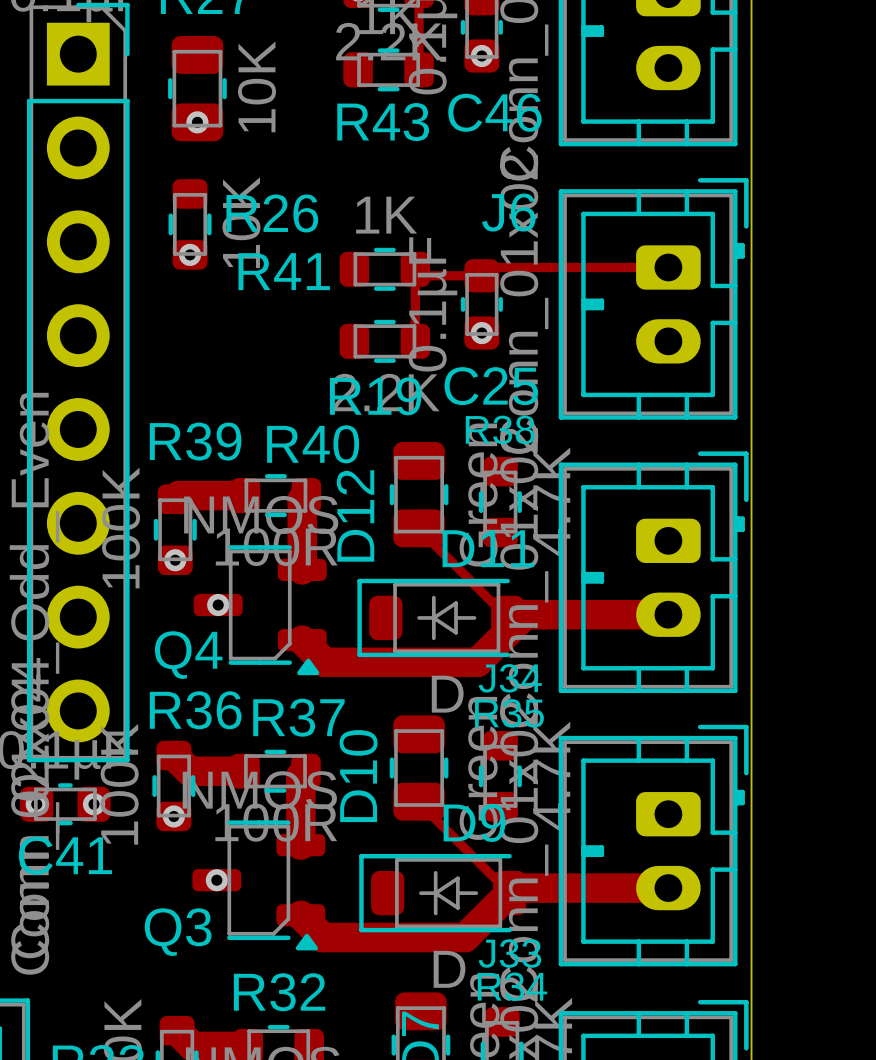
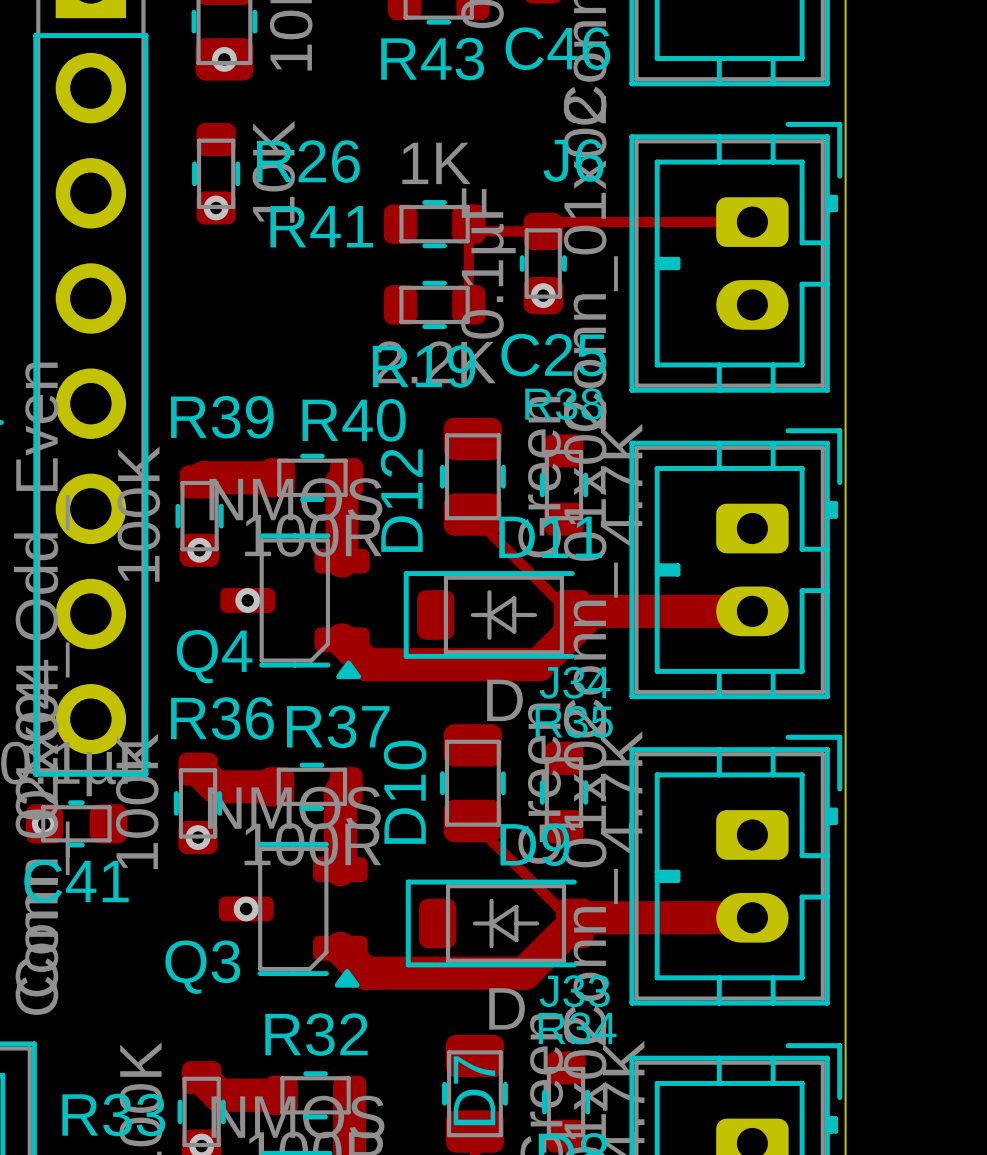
via: (94, 804) -> none

